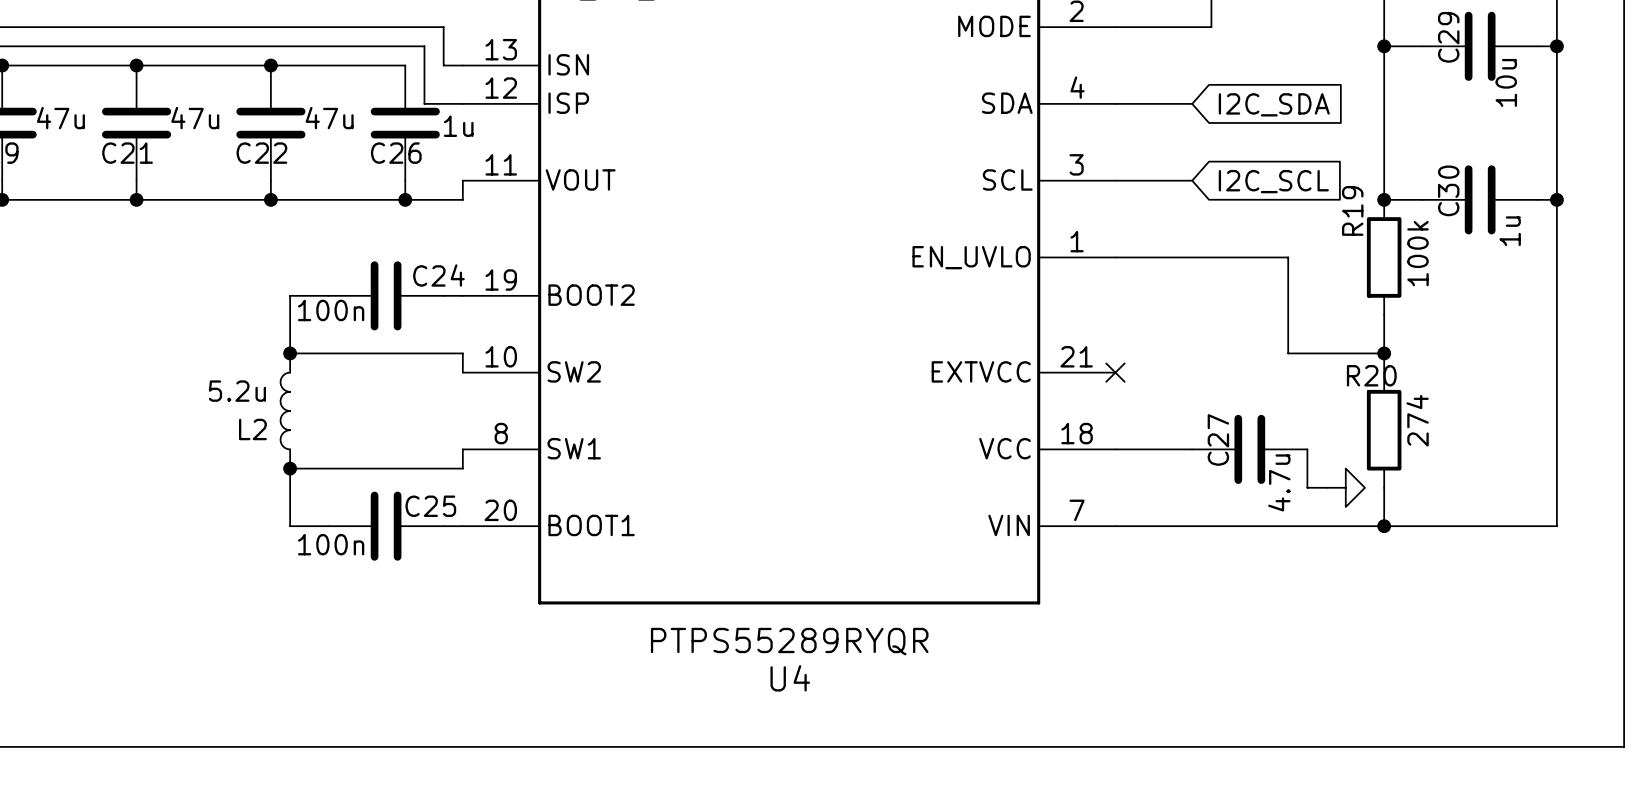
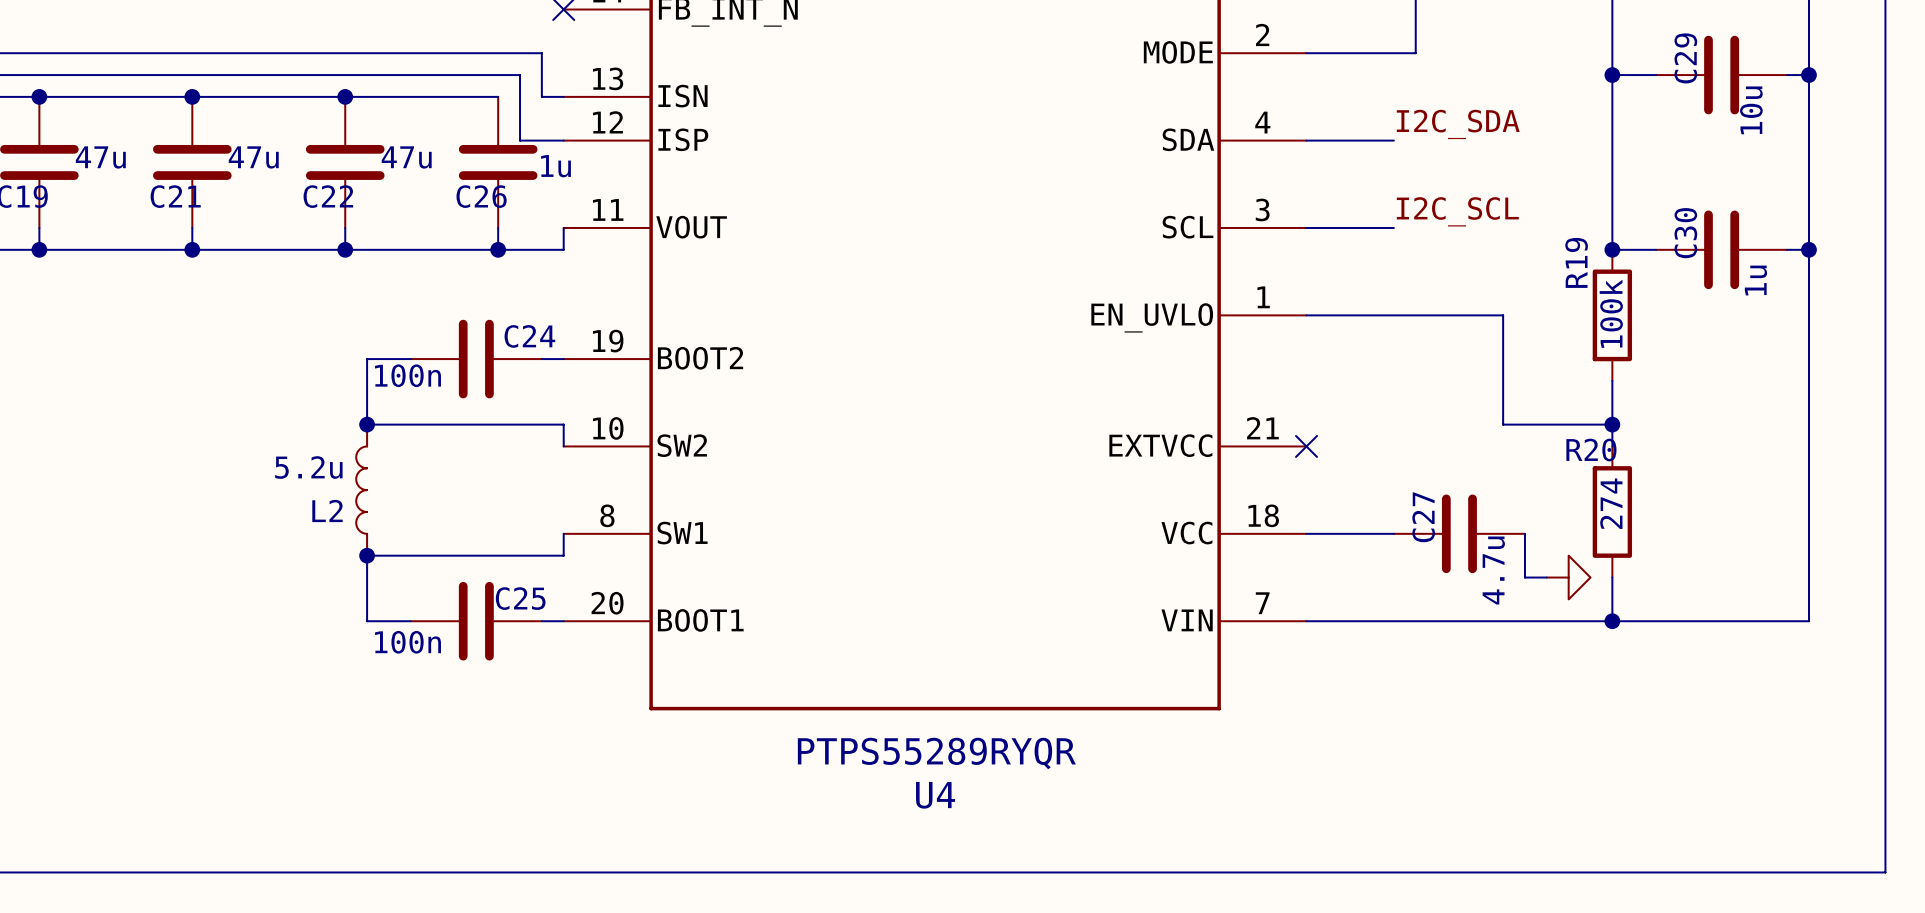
label: none -> I2C_SDA (1458, 124)
global label: I2C_SDA (1274, 104) -> none
label: none -> I2C_SCL (1457, 211)
global label: I2C_SCL (1273, 181) -> none
R19 value position: 100k (1418, 253) -> 100k (1611, 313)
R20 value position: 274 (1417, 420) -> 274 (1611, 503)

